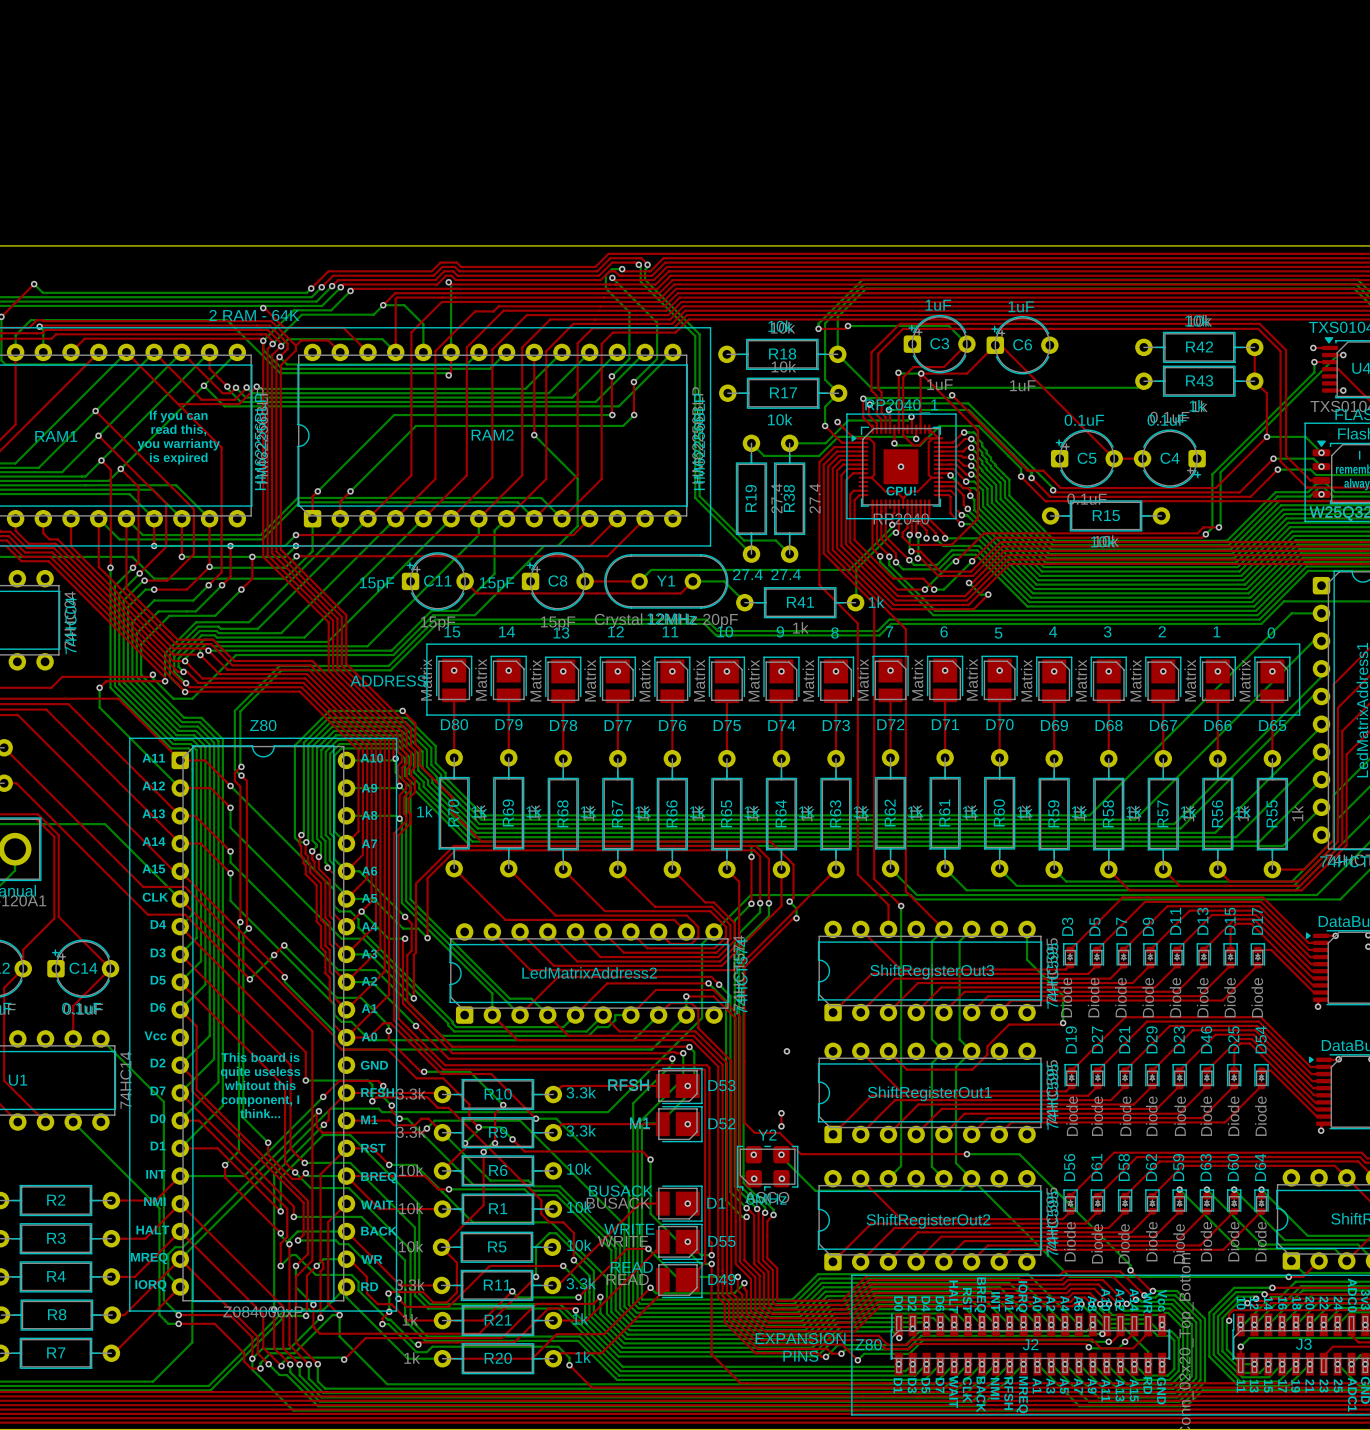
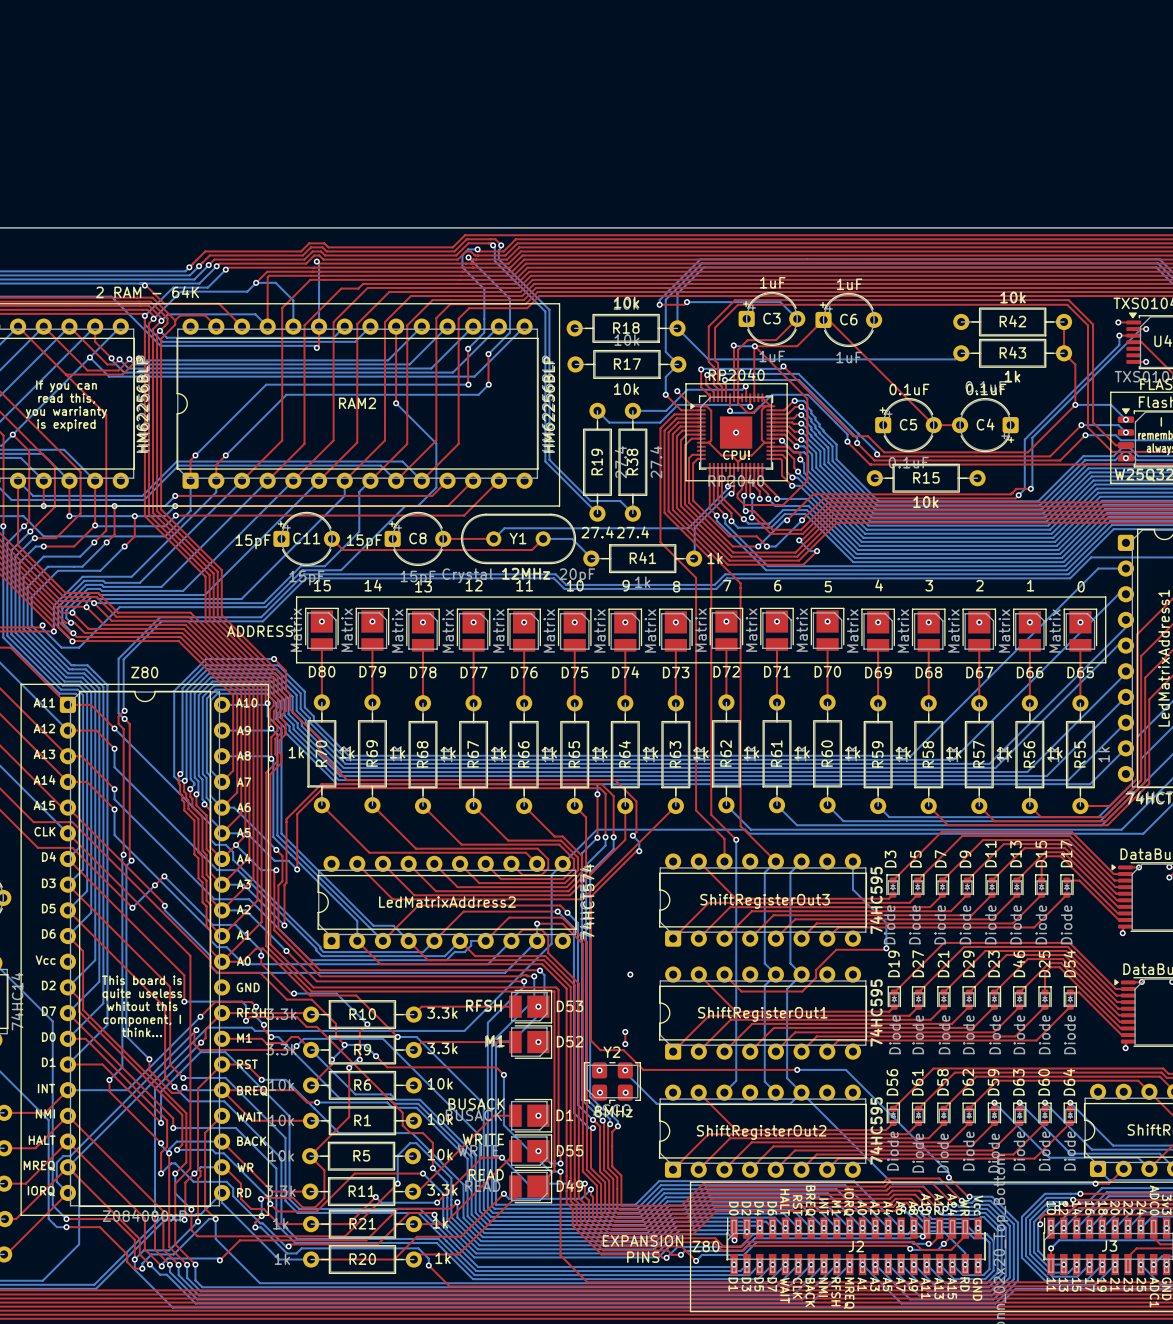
RP2040_1 name: RP2040_1 (901, 406) -> RP2040 (736, 374)

